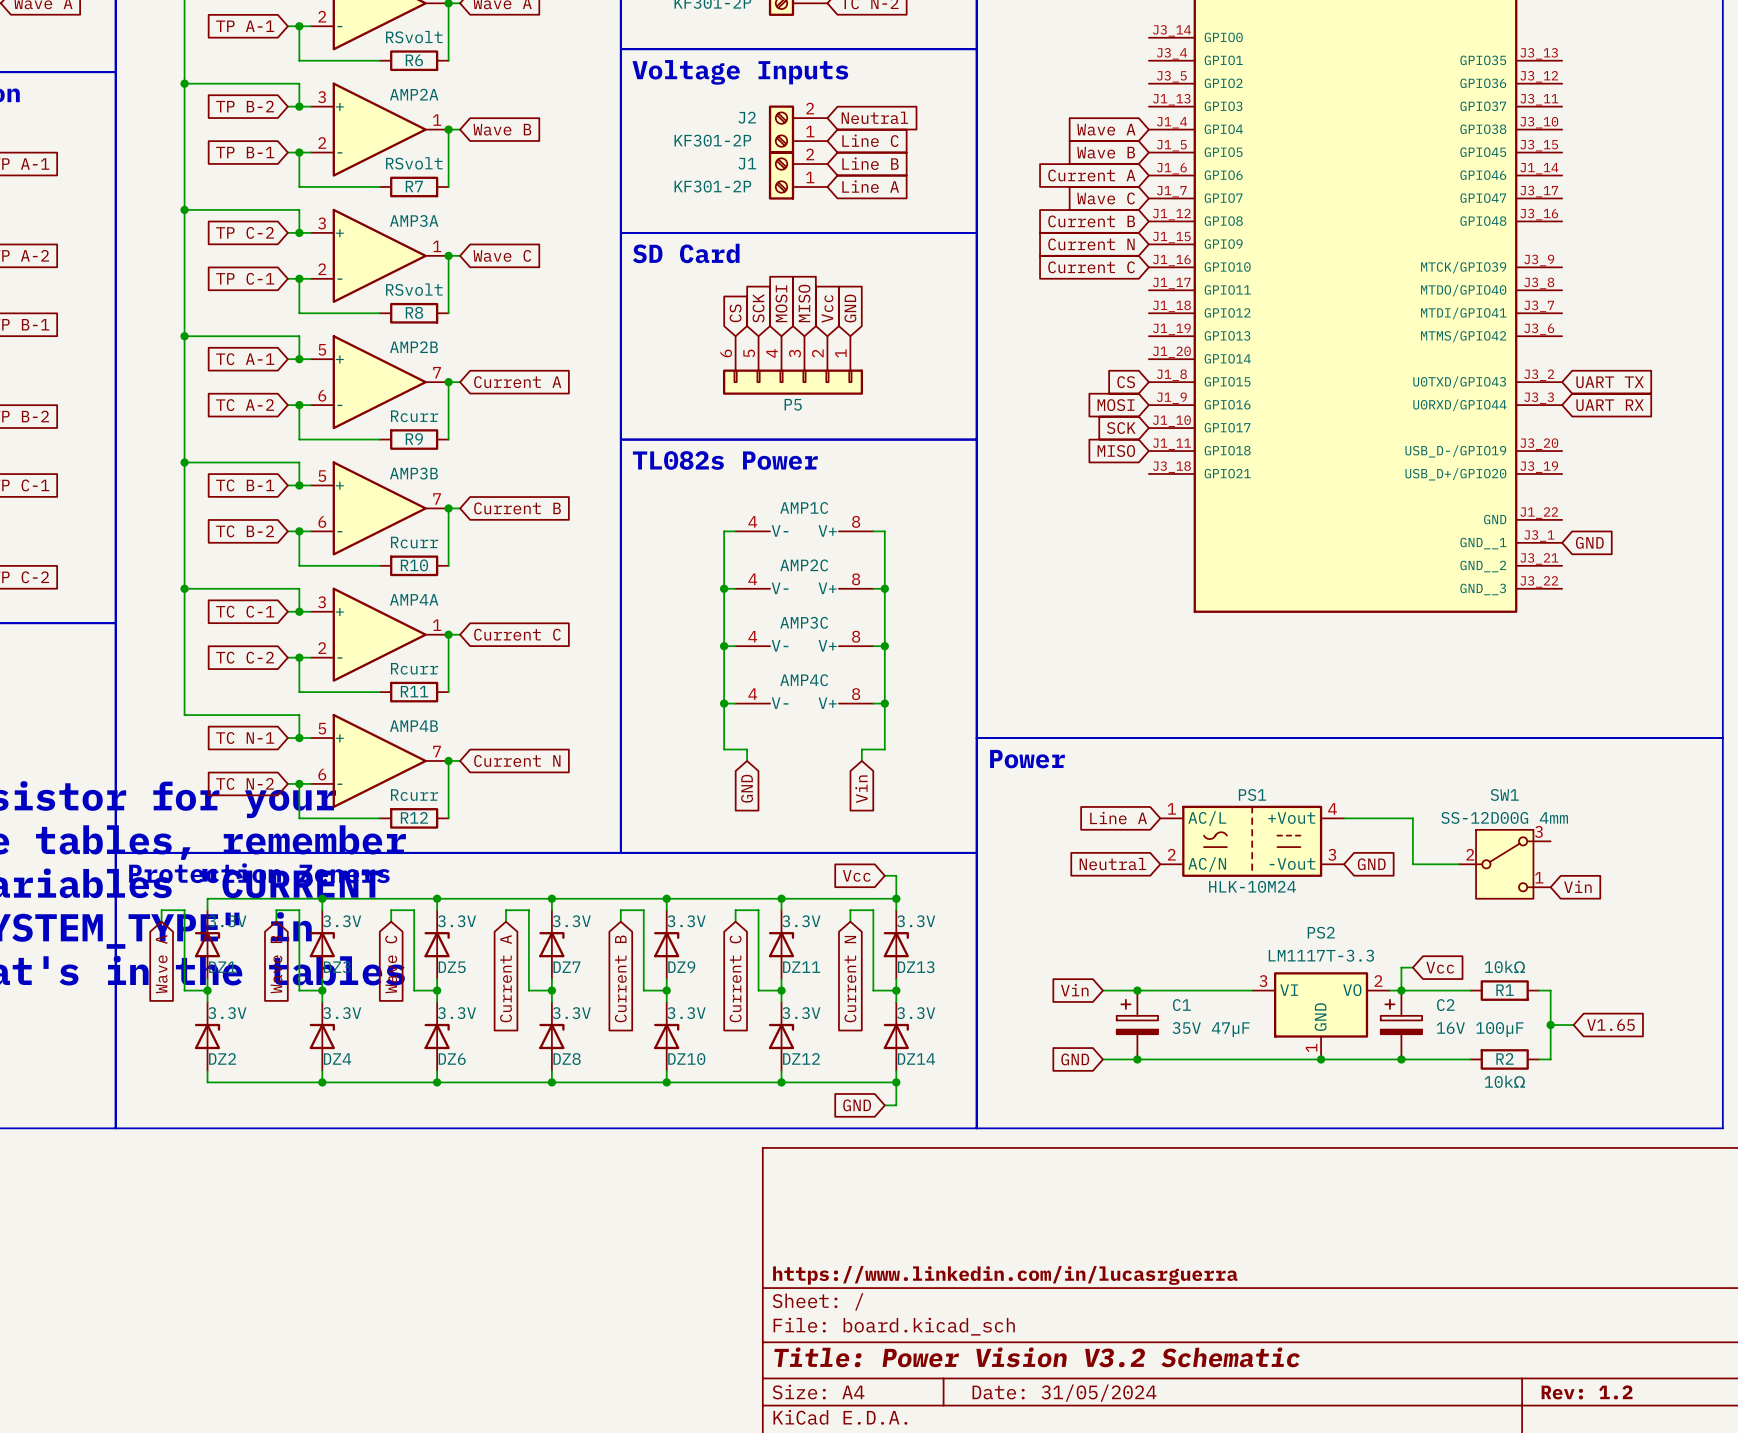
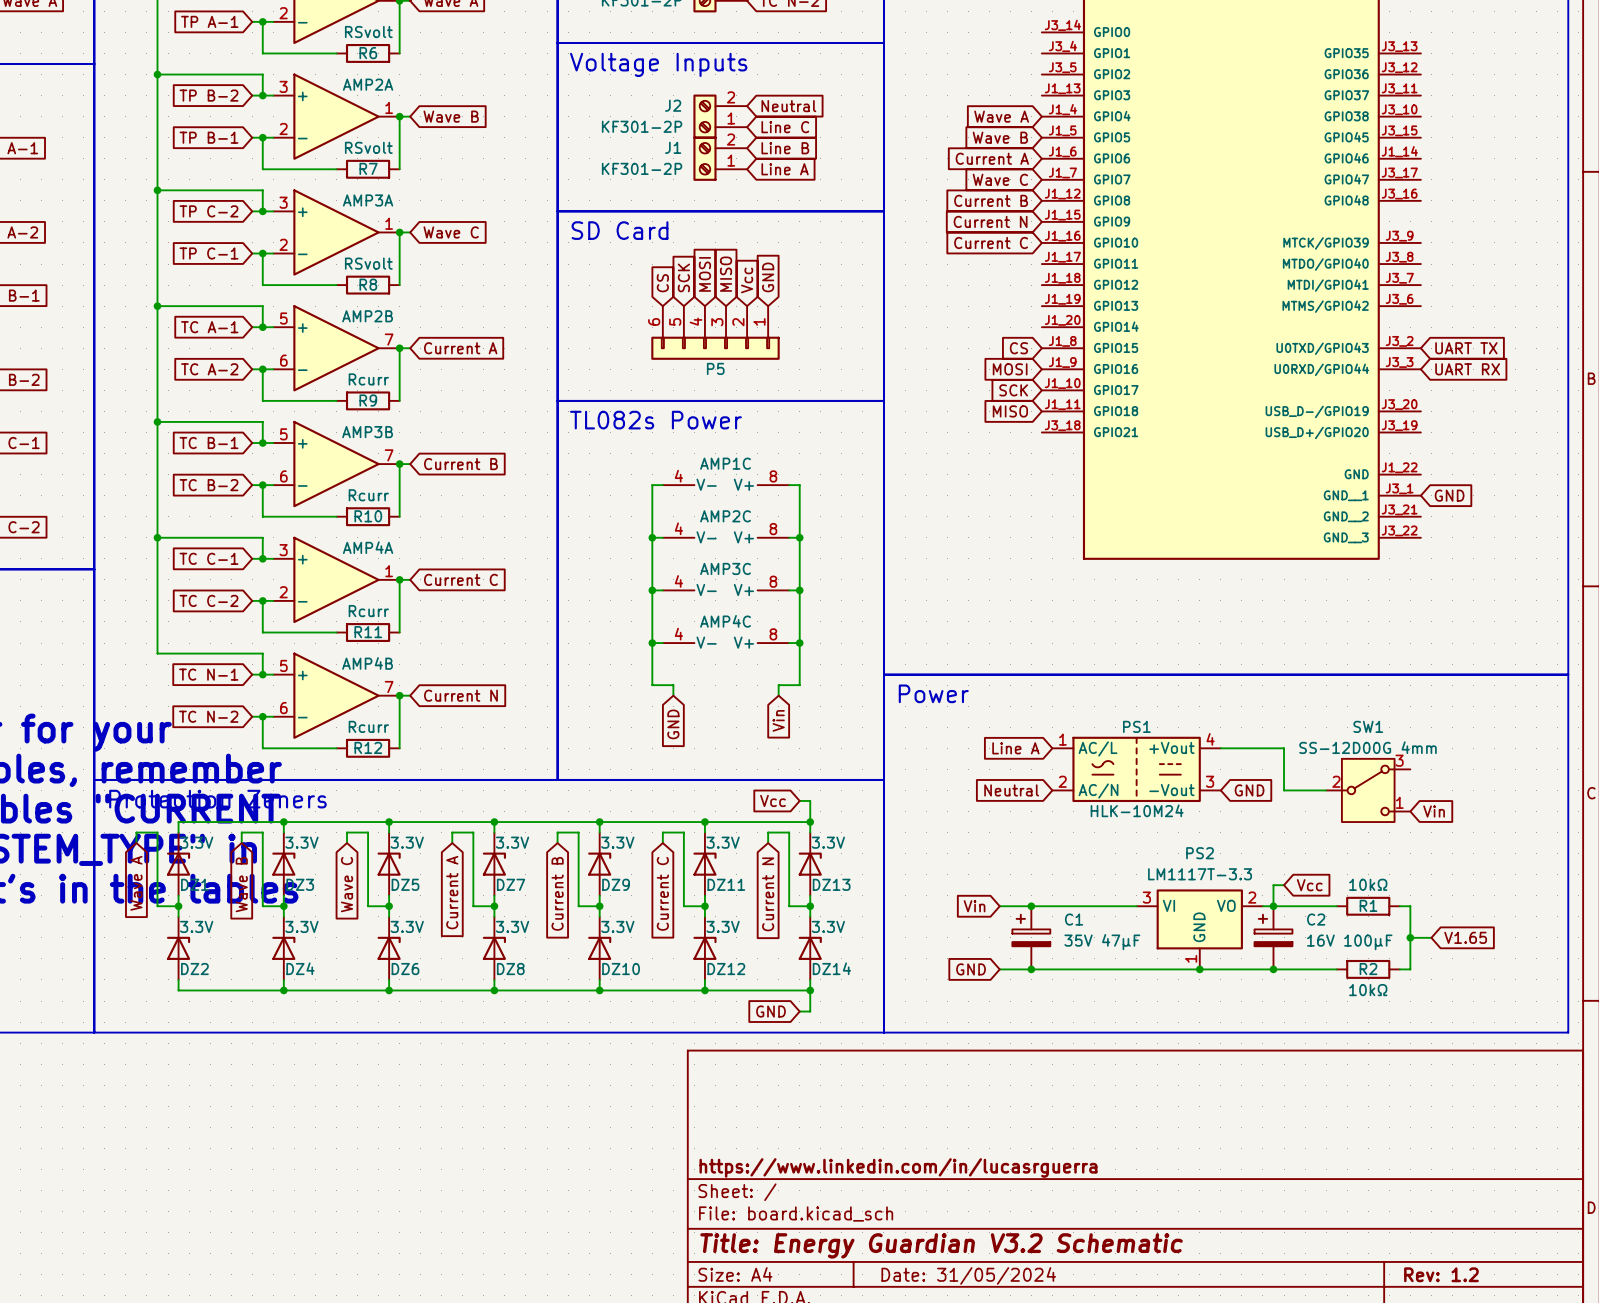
title block: Title: Power Vision V3.2 Schematic (1037, 1357) -> Title: Energy Guardian V3.2 Schematic (941, 1245)

